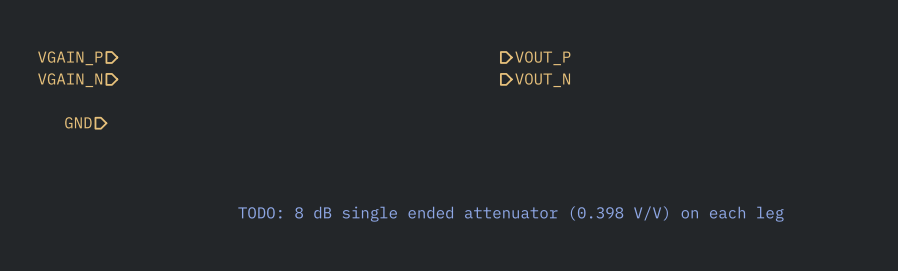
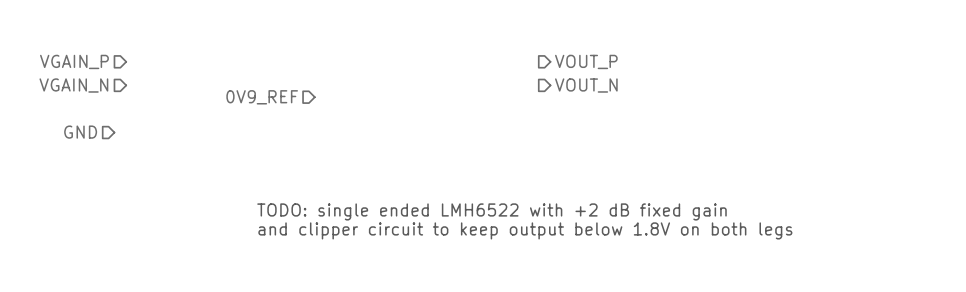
hierarchical label: none -> 0V9_REF (262, 97)
text: none -> TODO: single ended LMH6522 with +2 dB fixed gain (491, 211)
text: TODO: 8 dB single ended attenuator (0.398 V/V) on each leg (510, 214) -> and clipper circuit to keep output below 1.8V on both legs (525, 230)

